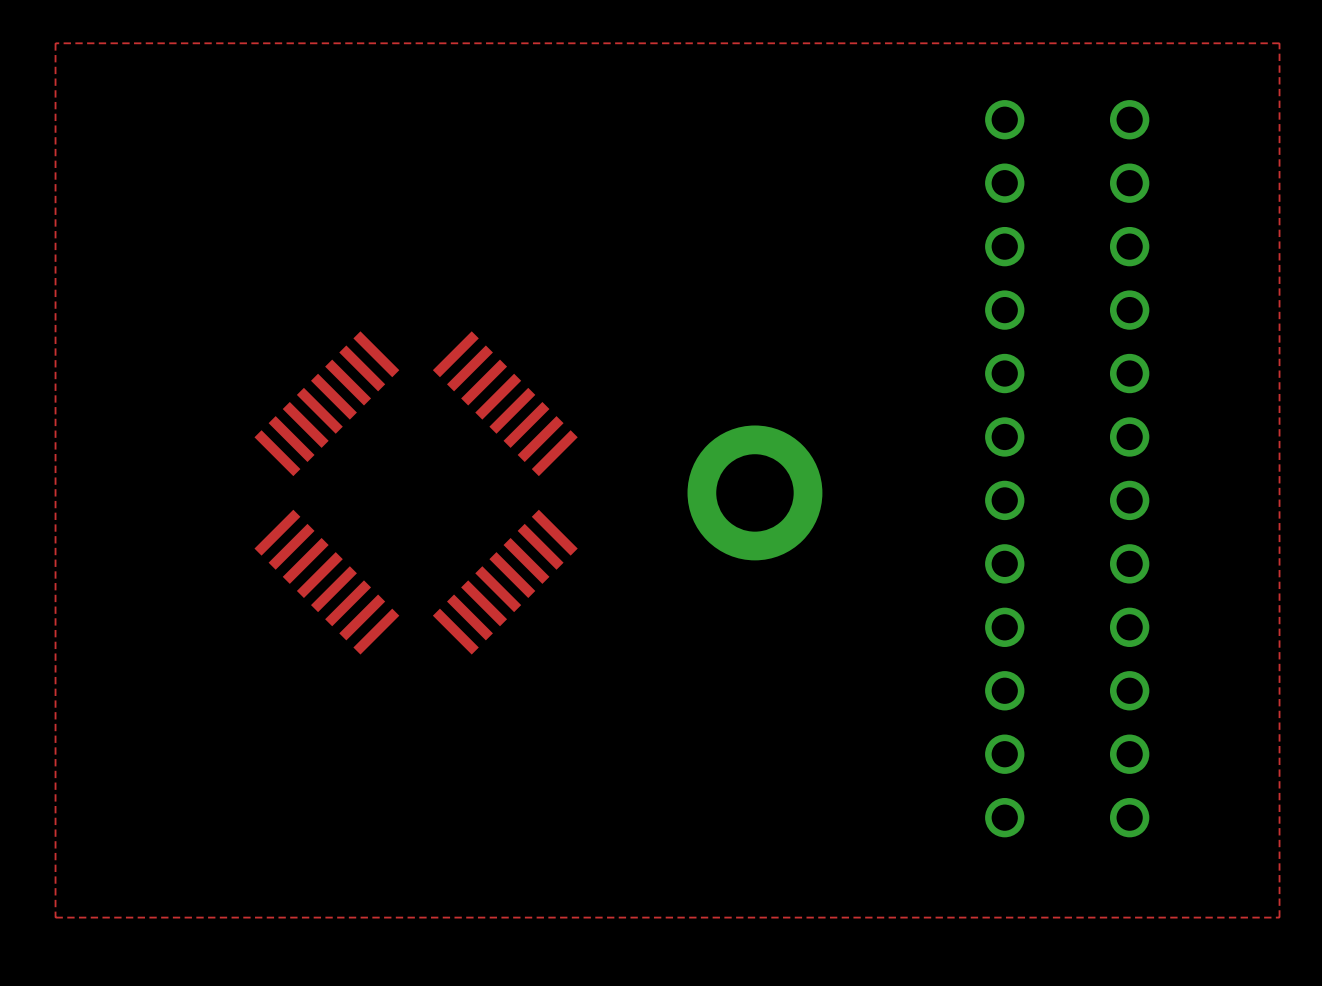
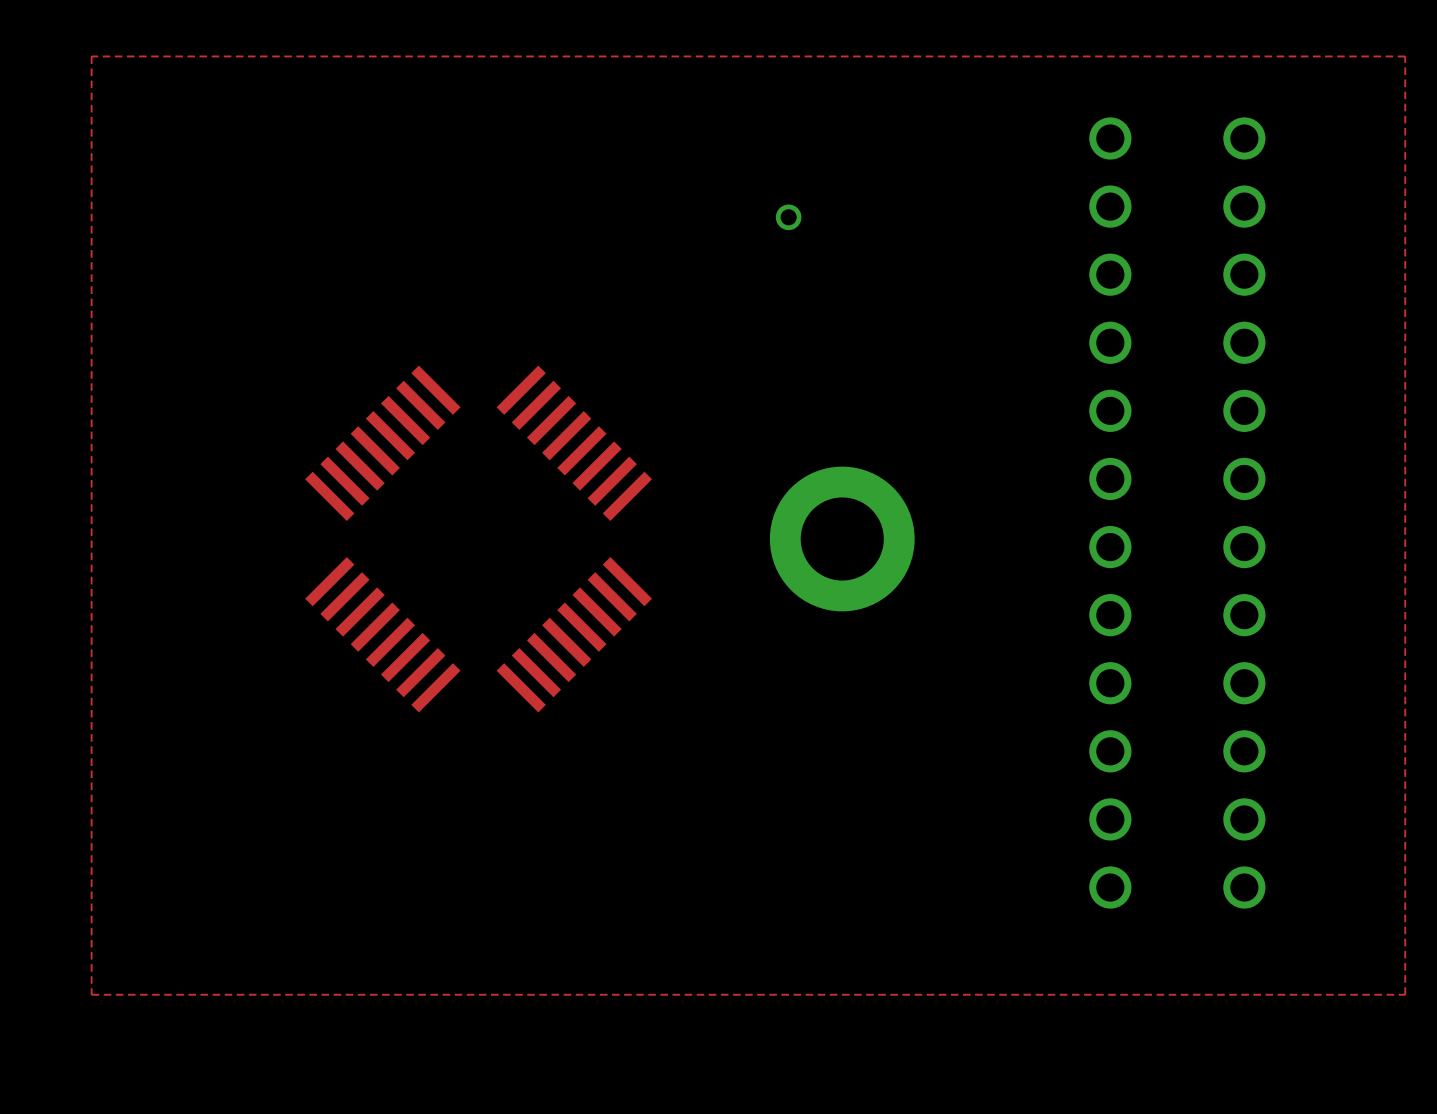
via: none -> (788, 217)

